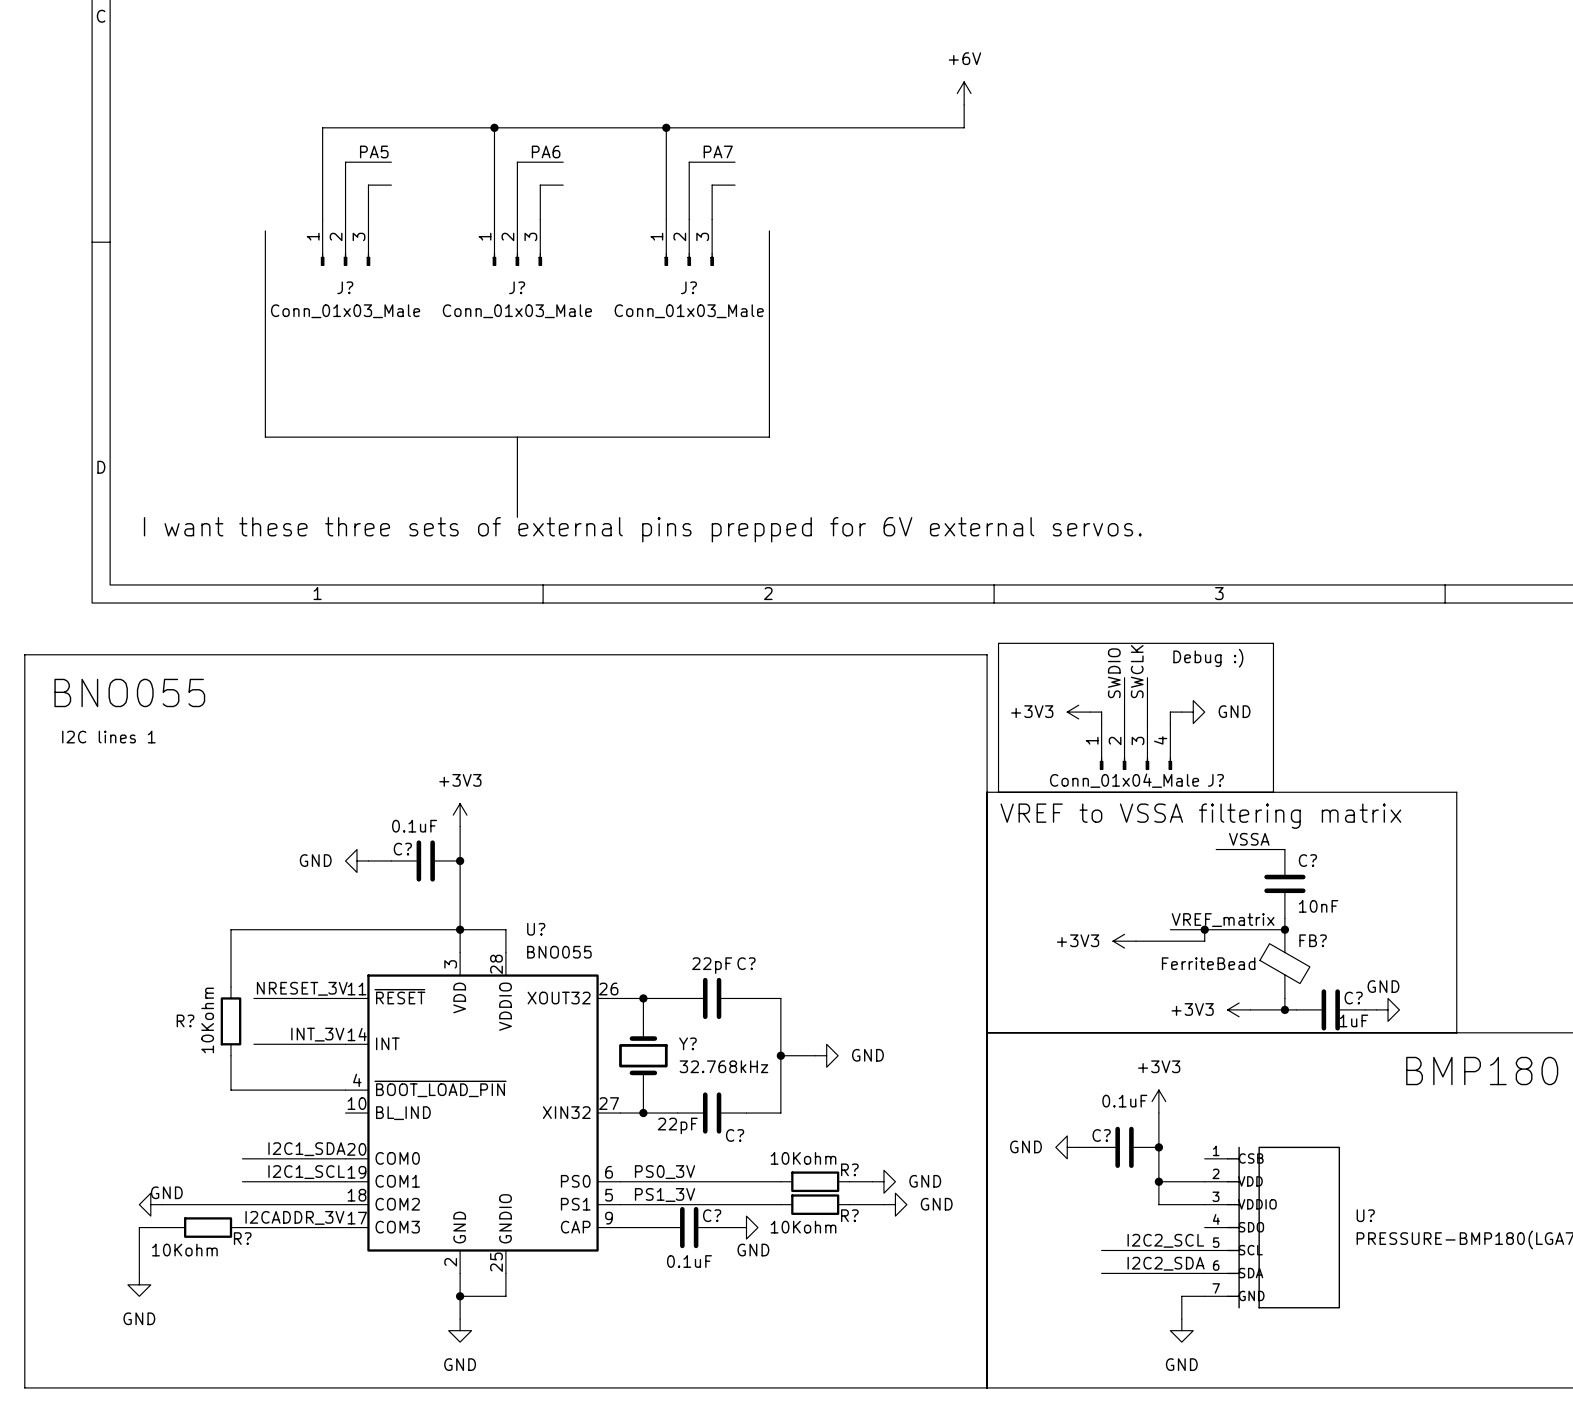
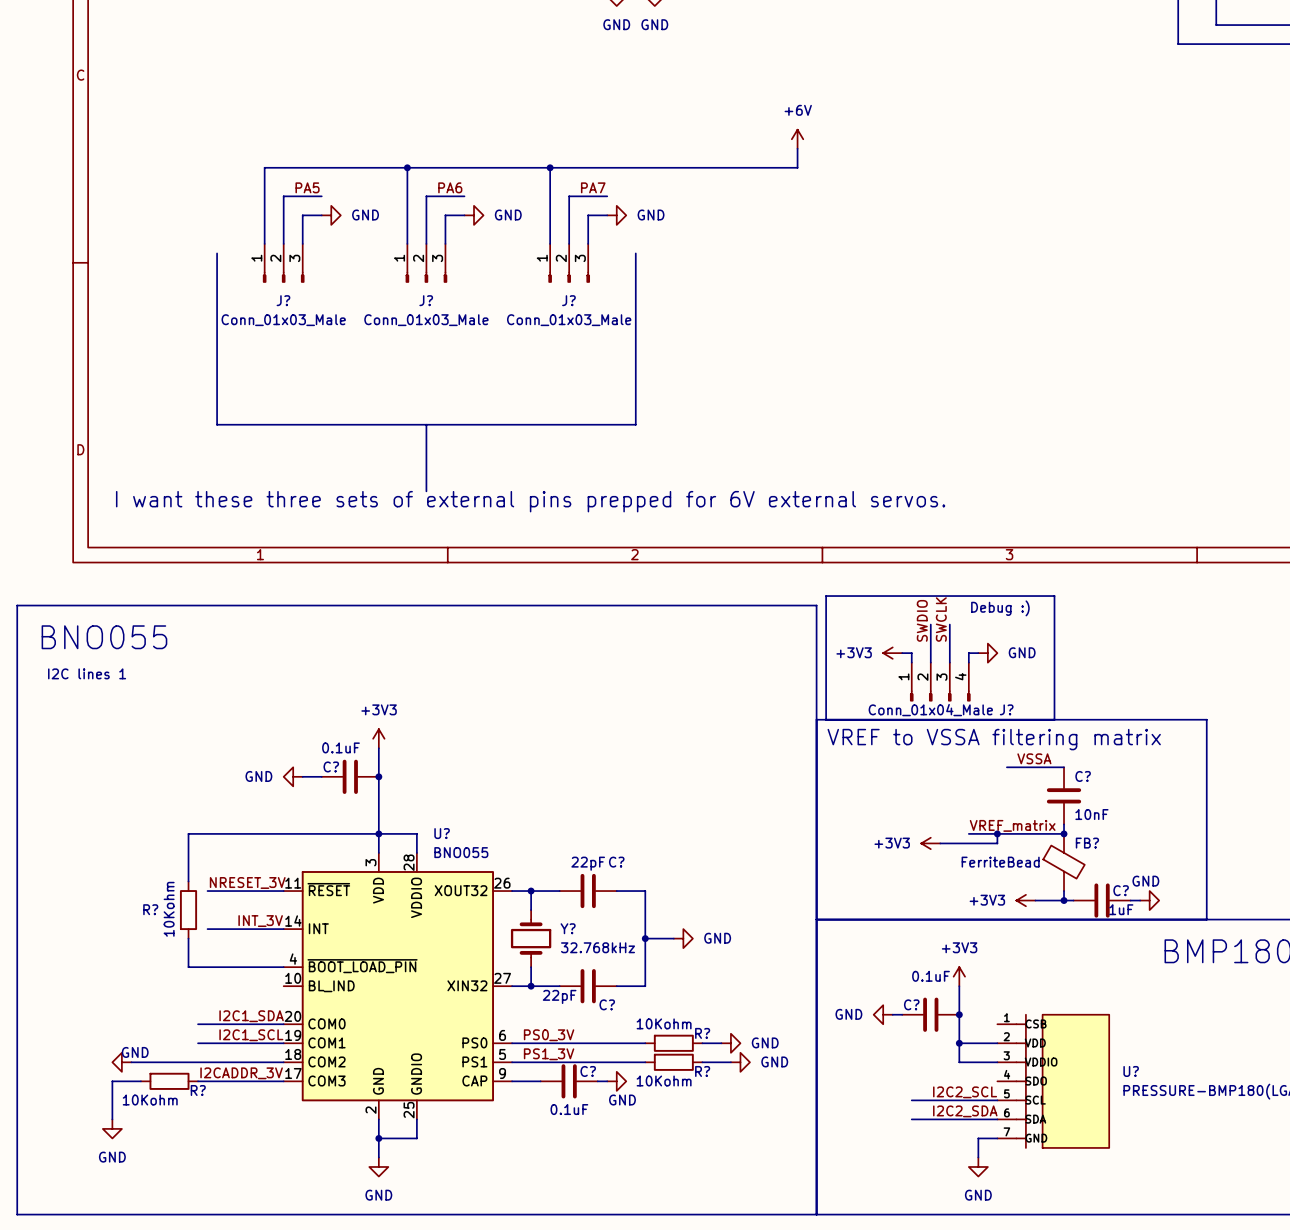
power symbol: none -> GND (331, 215)
power symbol: none -> GND (474, 215)
power symbol: none -> GND (616, 215)

